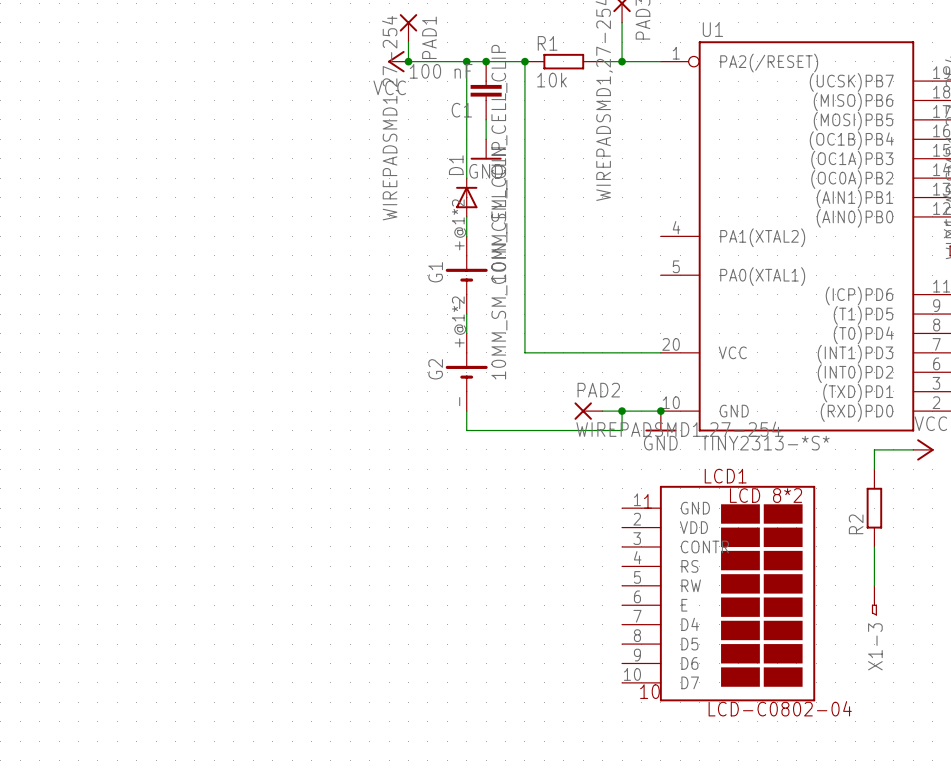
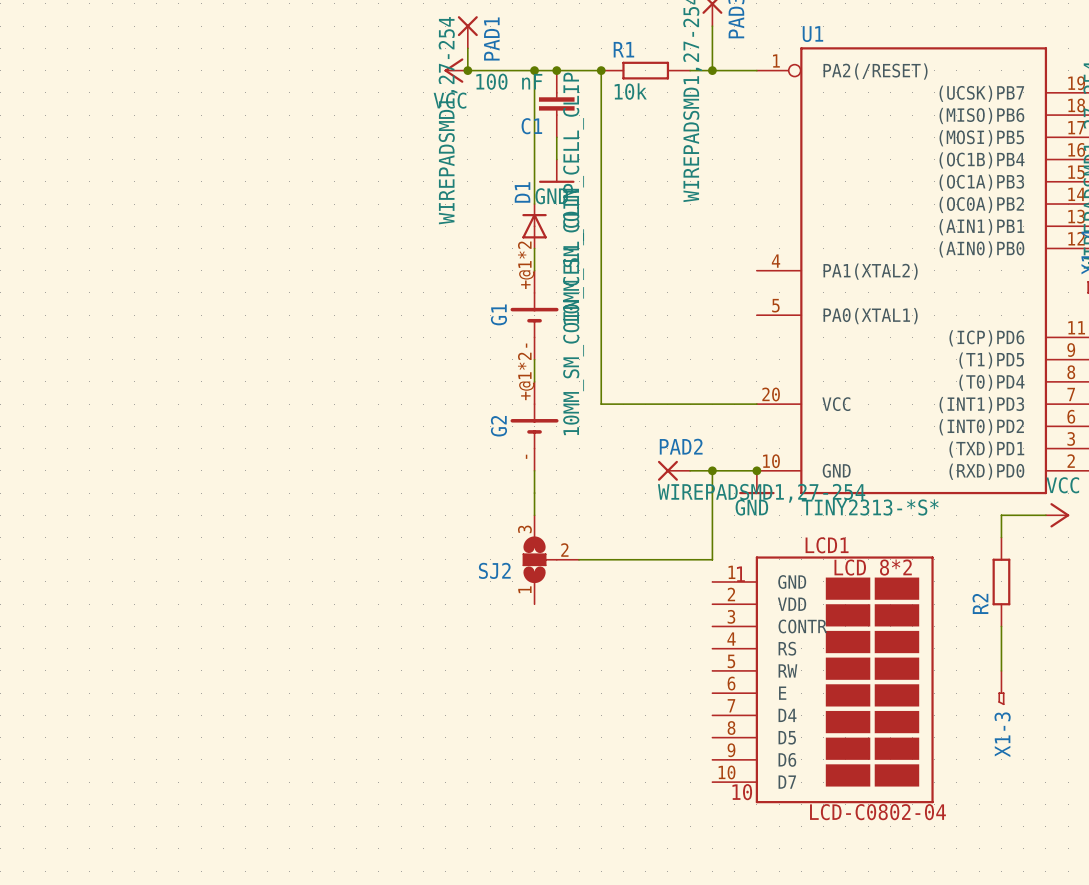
wire: (466, 430) (622, 430) -> (579, 559) (712, 559) (712, 493)
wire: none -> (534, 493) (534, 515)
SJ2: none -> (550, 559)

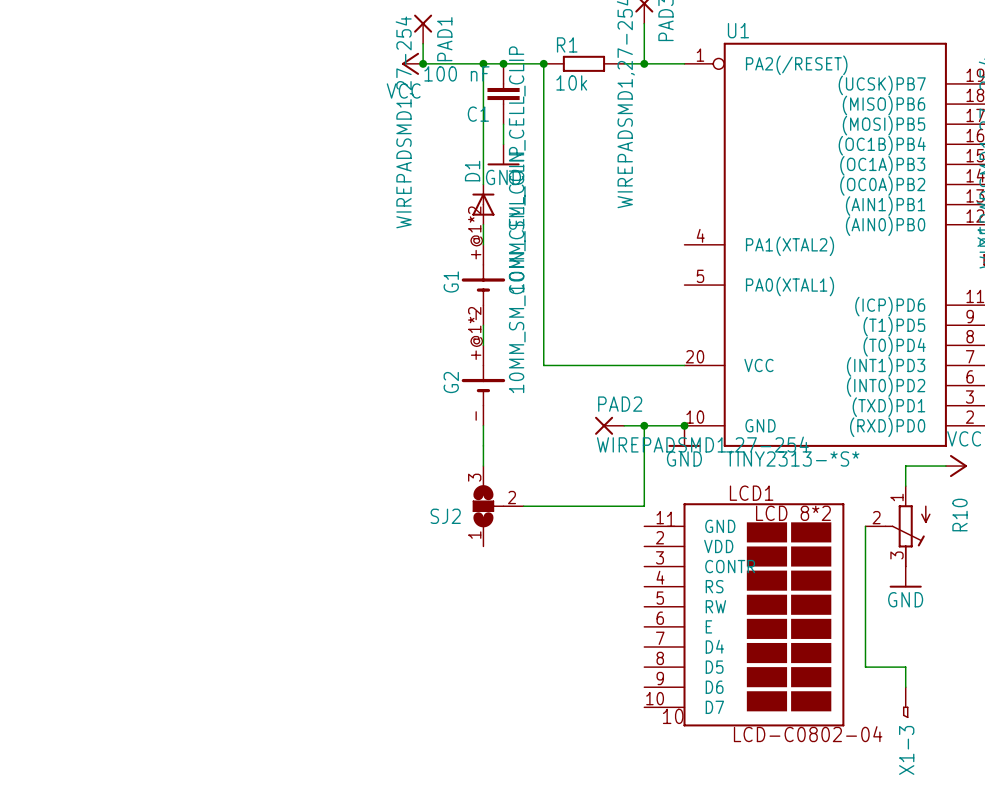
wire: none -> (865, 526) (865, 667) (905, 667) (905, 687)
R2: (1001, 581) -> none
R10: none -> (897, 526)
power symbol: none -> GND (905, 577)
X1-3 position: (1001, 687) -> (905, 702)

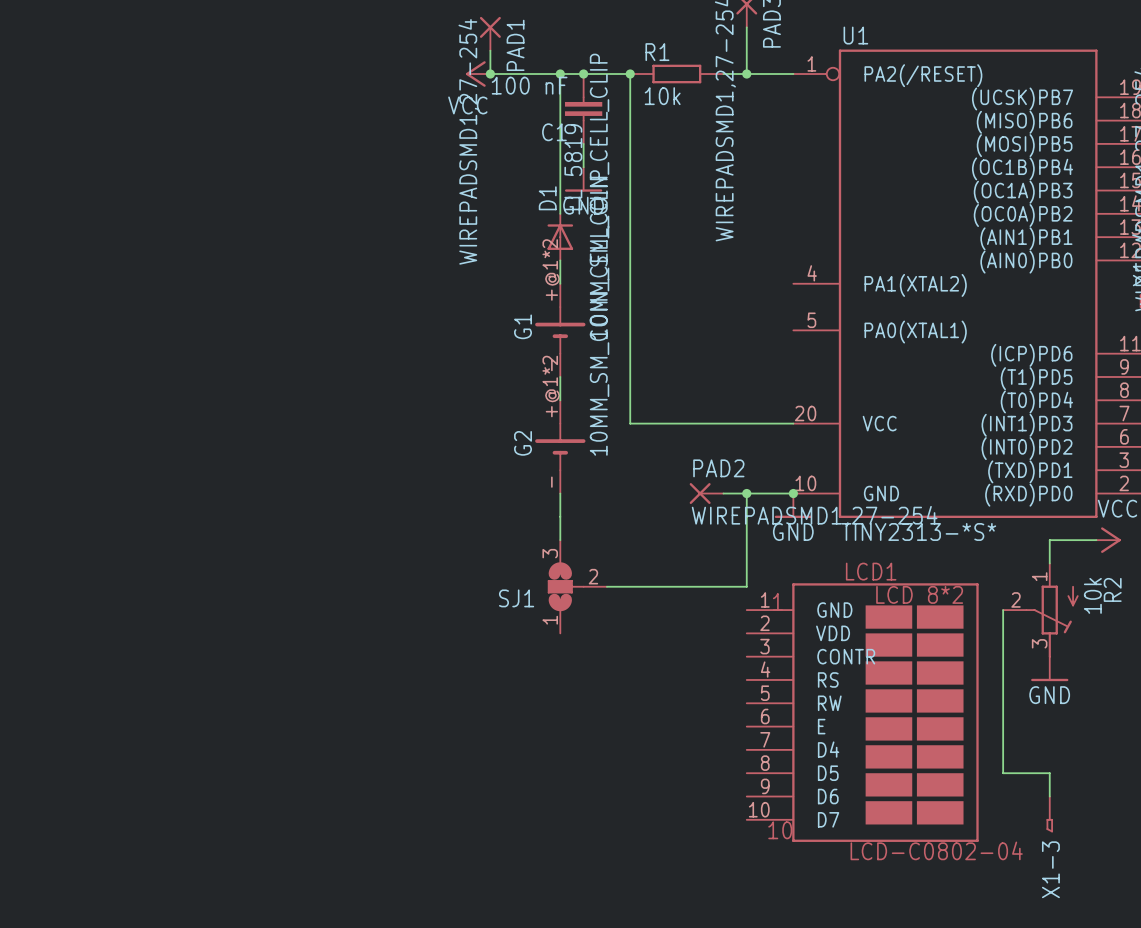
D1 value: none -> LL 5819 (573, 167)
R10 value: none -> 10k (1092, 595)
R10 name: R10 (960, 515) -> R2 (1112, 589)
SJ2 name: SJ2 (445, 516) -> SJ1 (516, 598)

